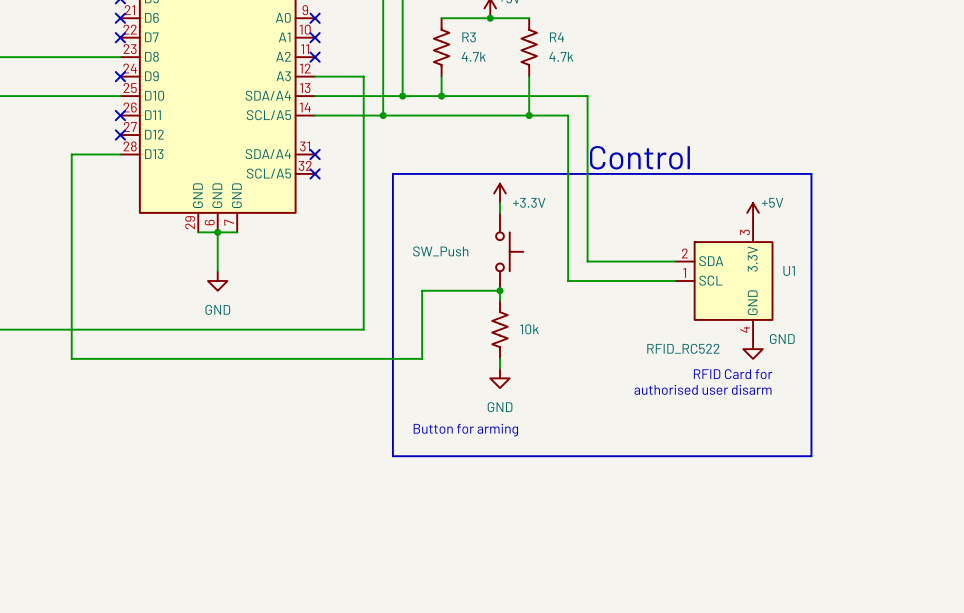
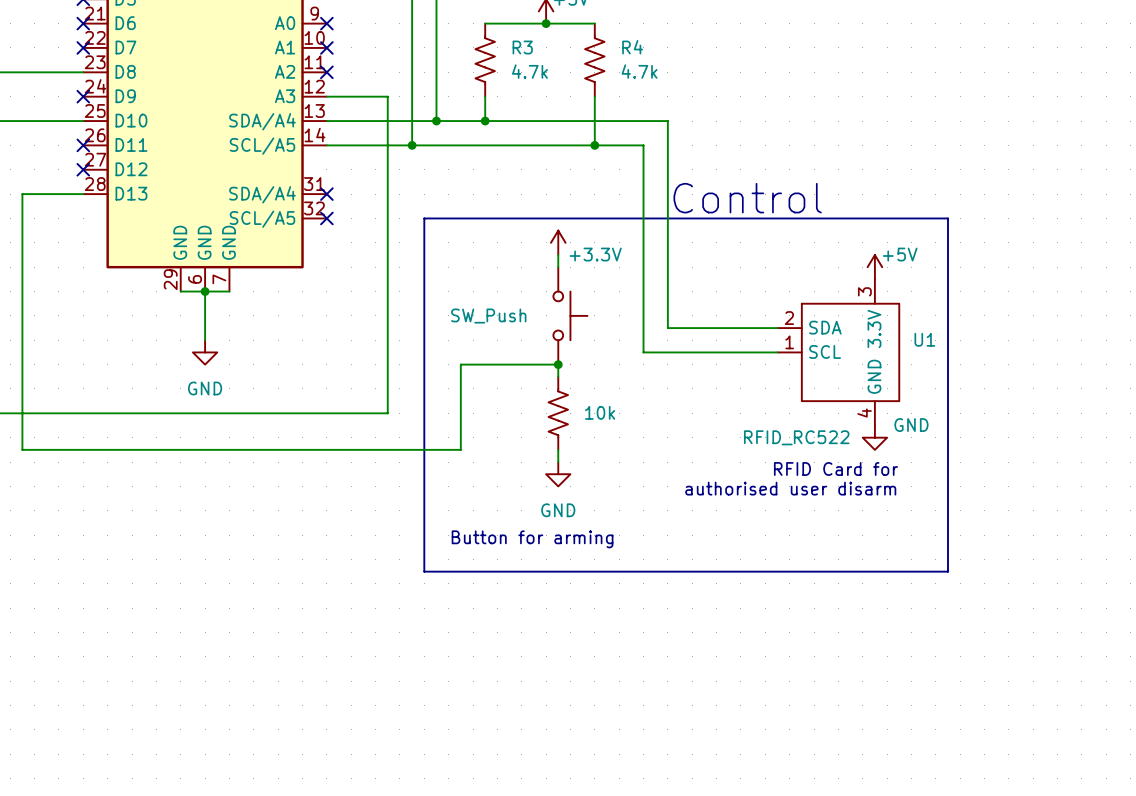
U1 symbol: [675, 222, 773, 340] -> [777, 279, 900, 426]

